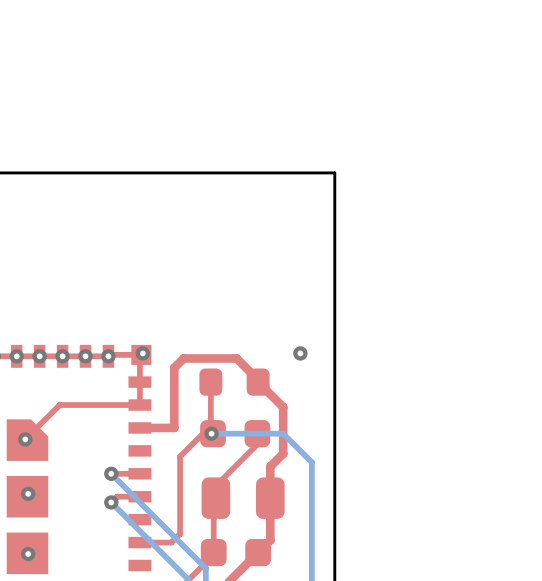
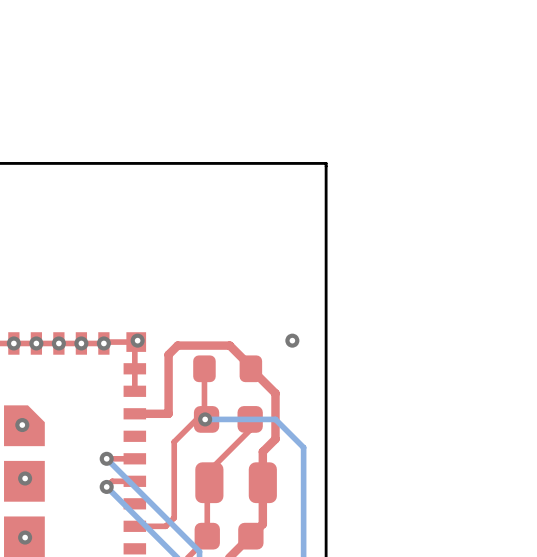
top track: (139, 405) (59, 405) (25, 439) -> none

